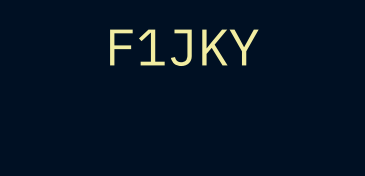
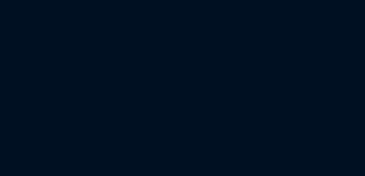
text: F1JKY (184, 47) -> none

